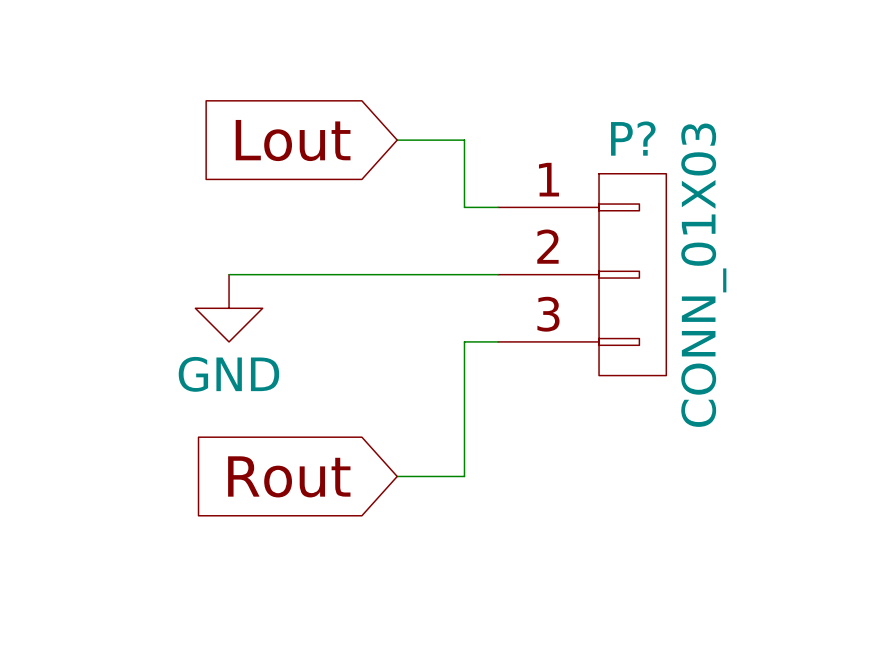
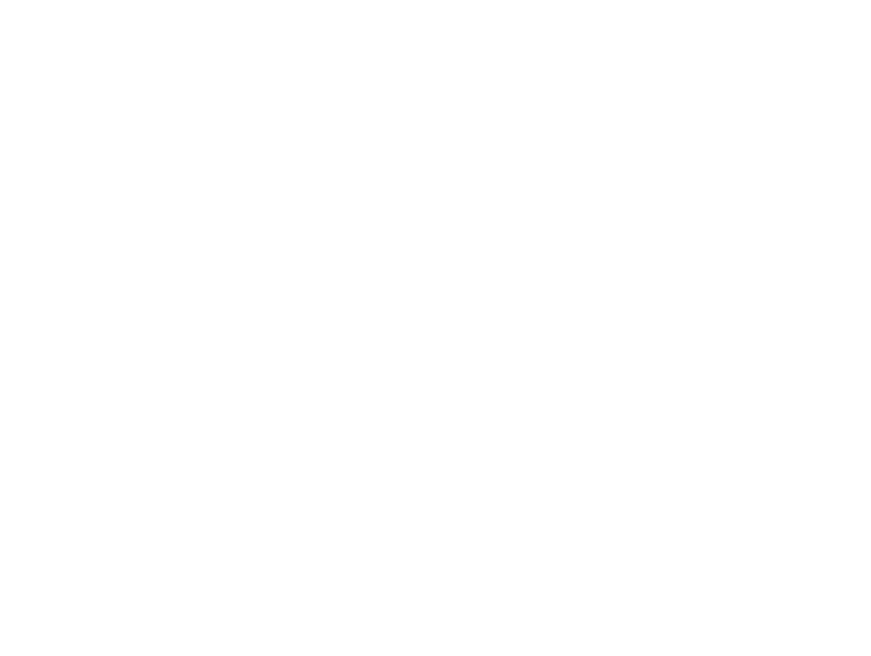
global label: Lout (293, 140) -> none
wire: (397, 140) (464, 140) (464, 207) (498, 207) -> none
wire: (229, 274) (498, 274) -> none
P?: CONN_01X03 (582, 274) -> none
power symbol: GND (229, 308) -> none
wire: (498, 341) (464, 341) (464, 476) (397, 476) -> none
global label: Rout (289, 476) -> none

